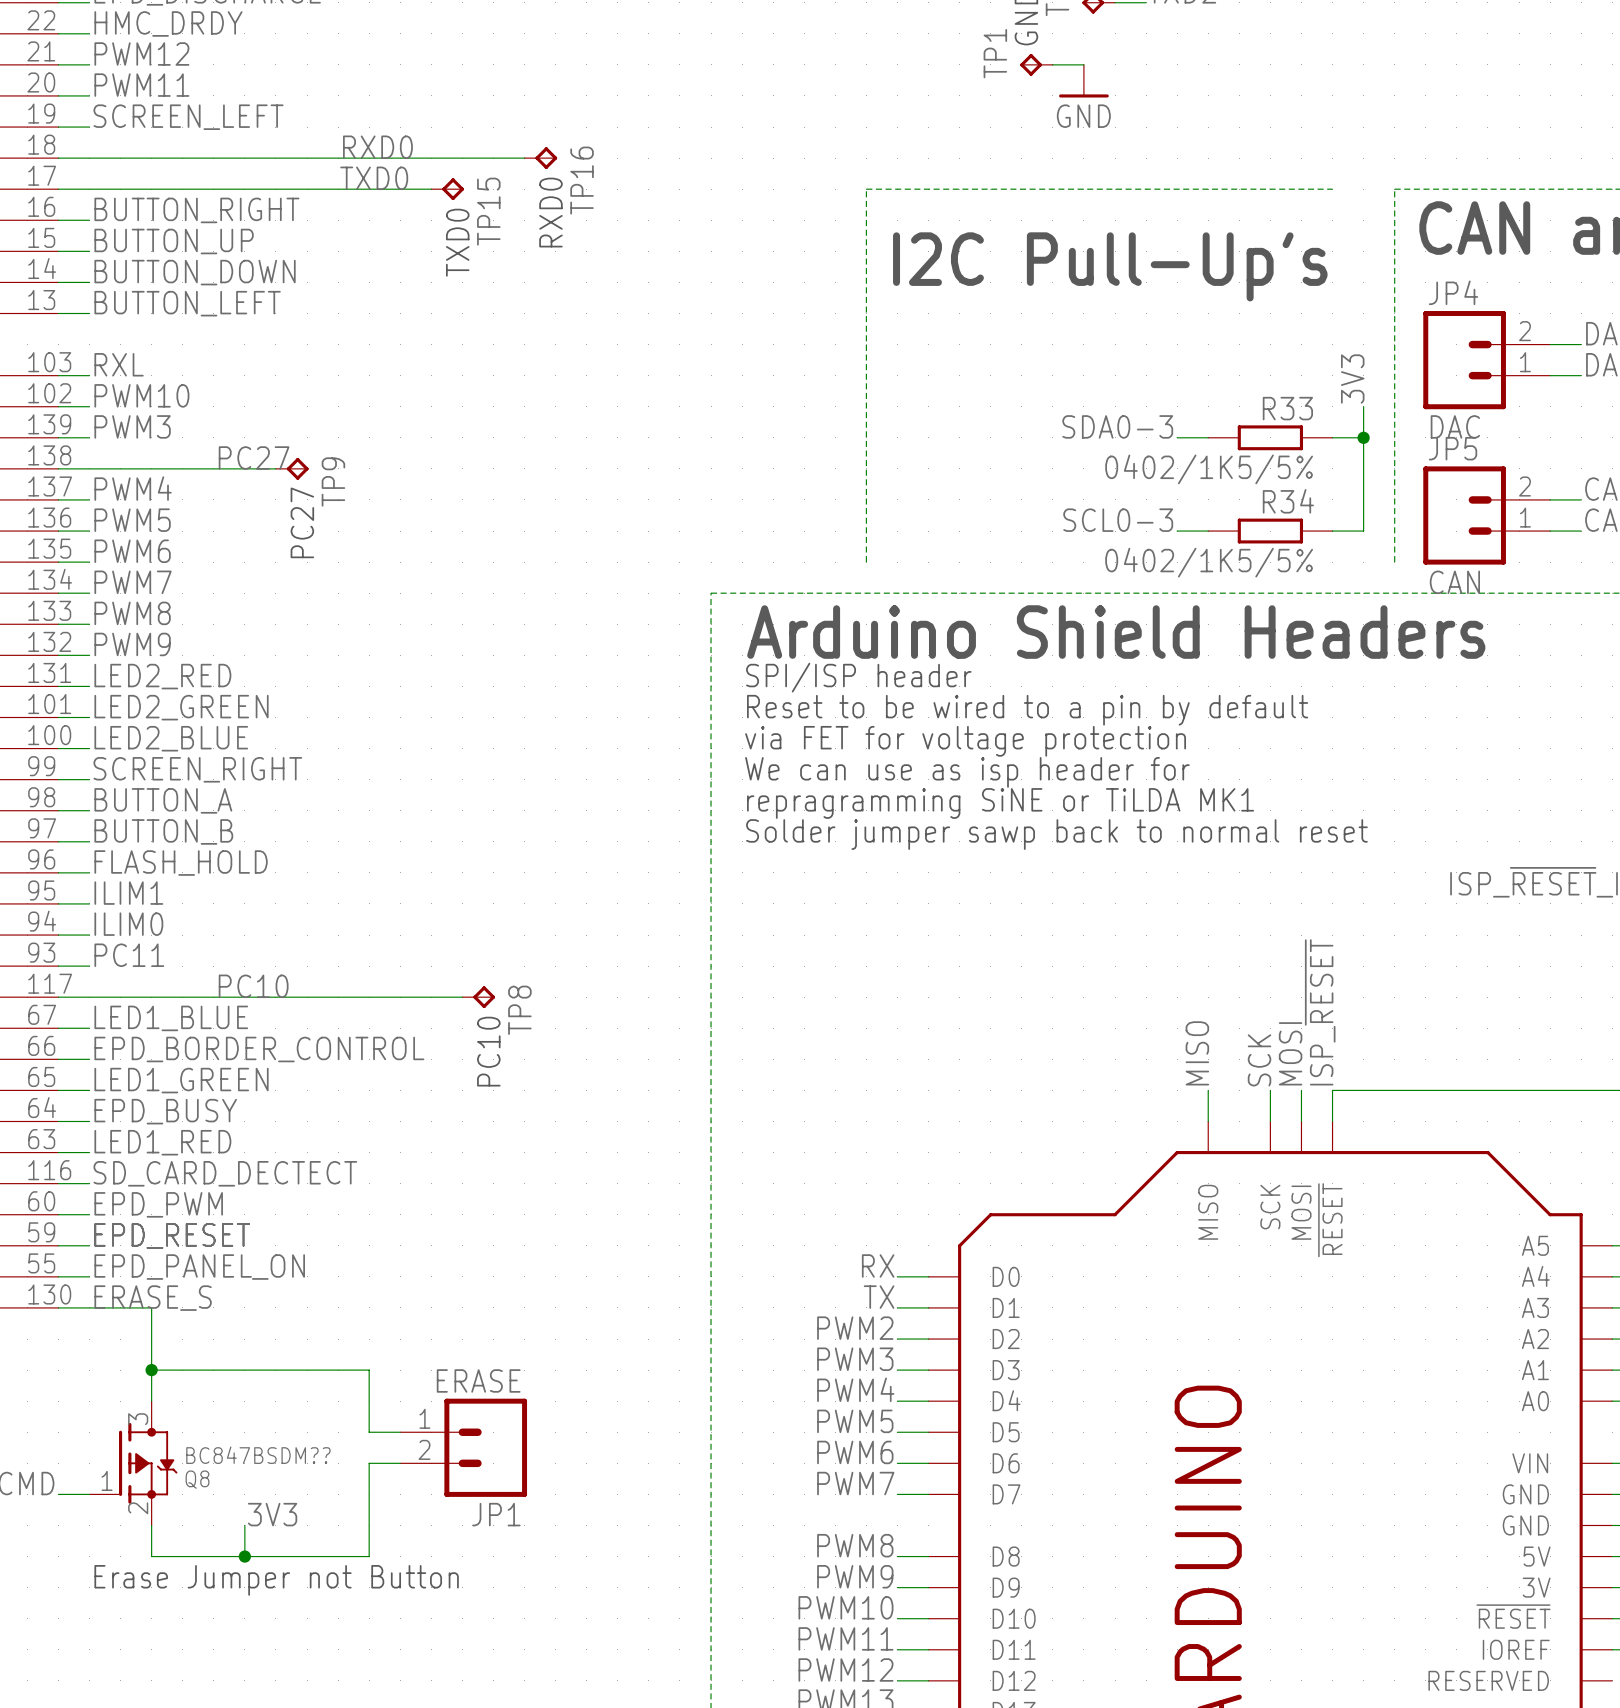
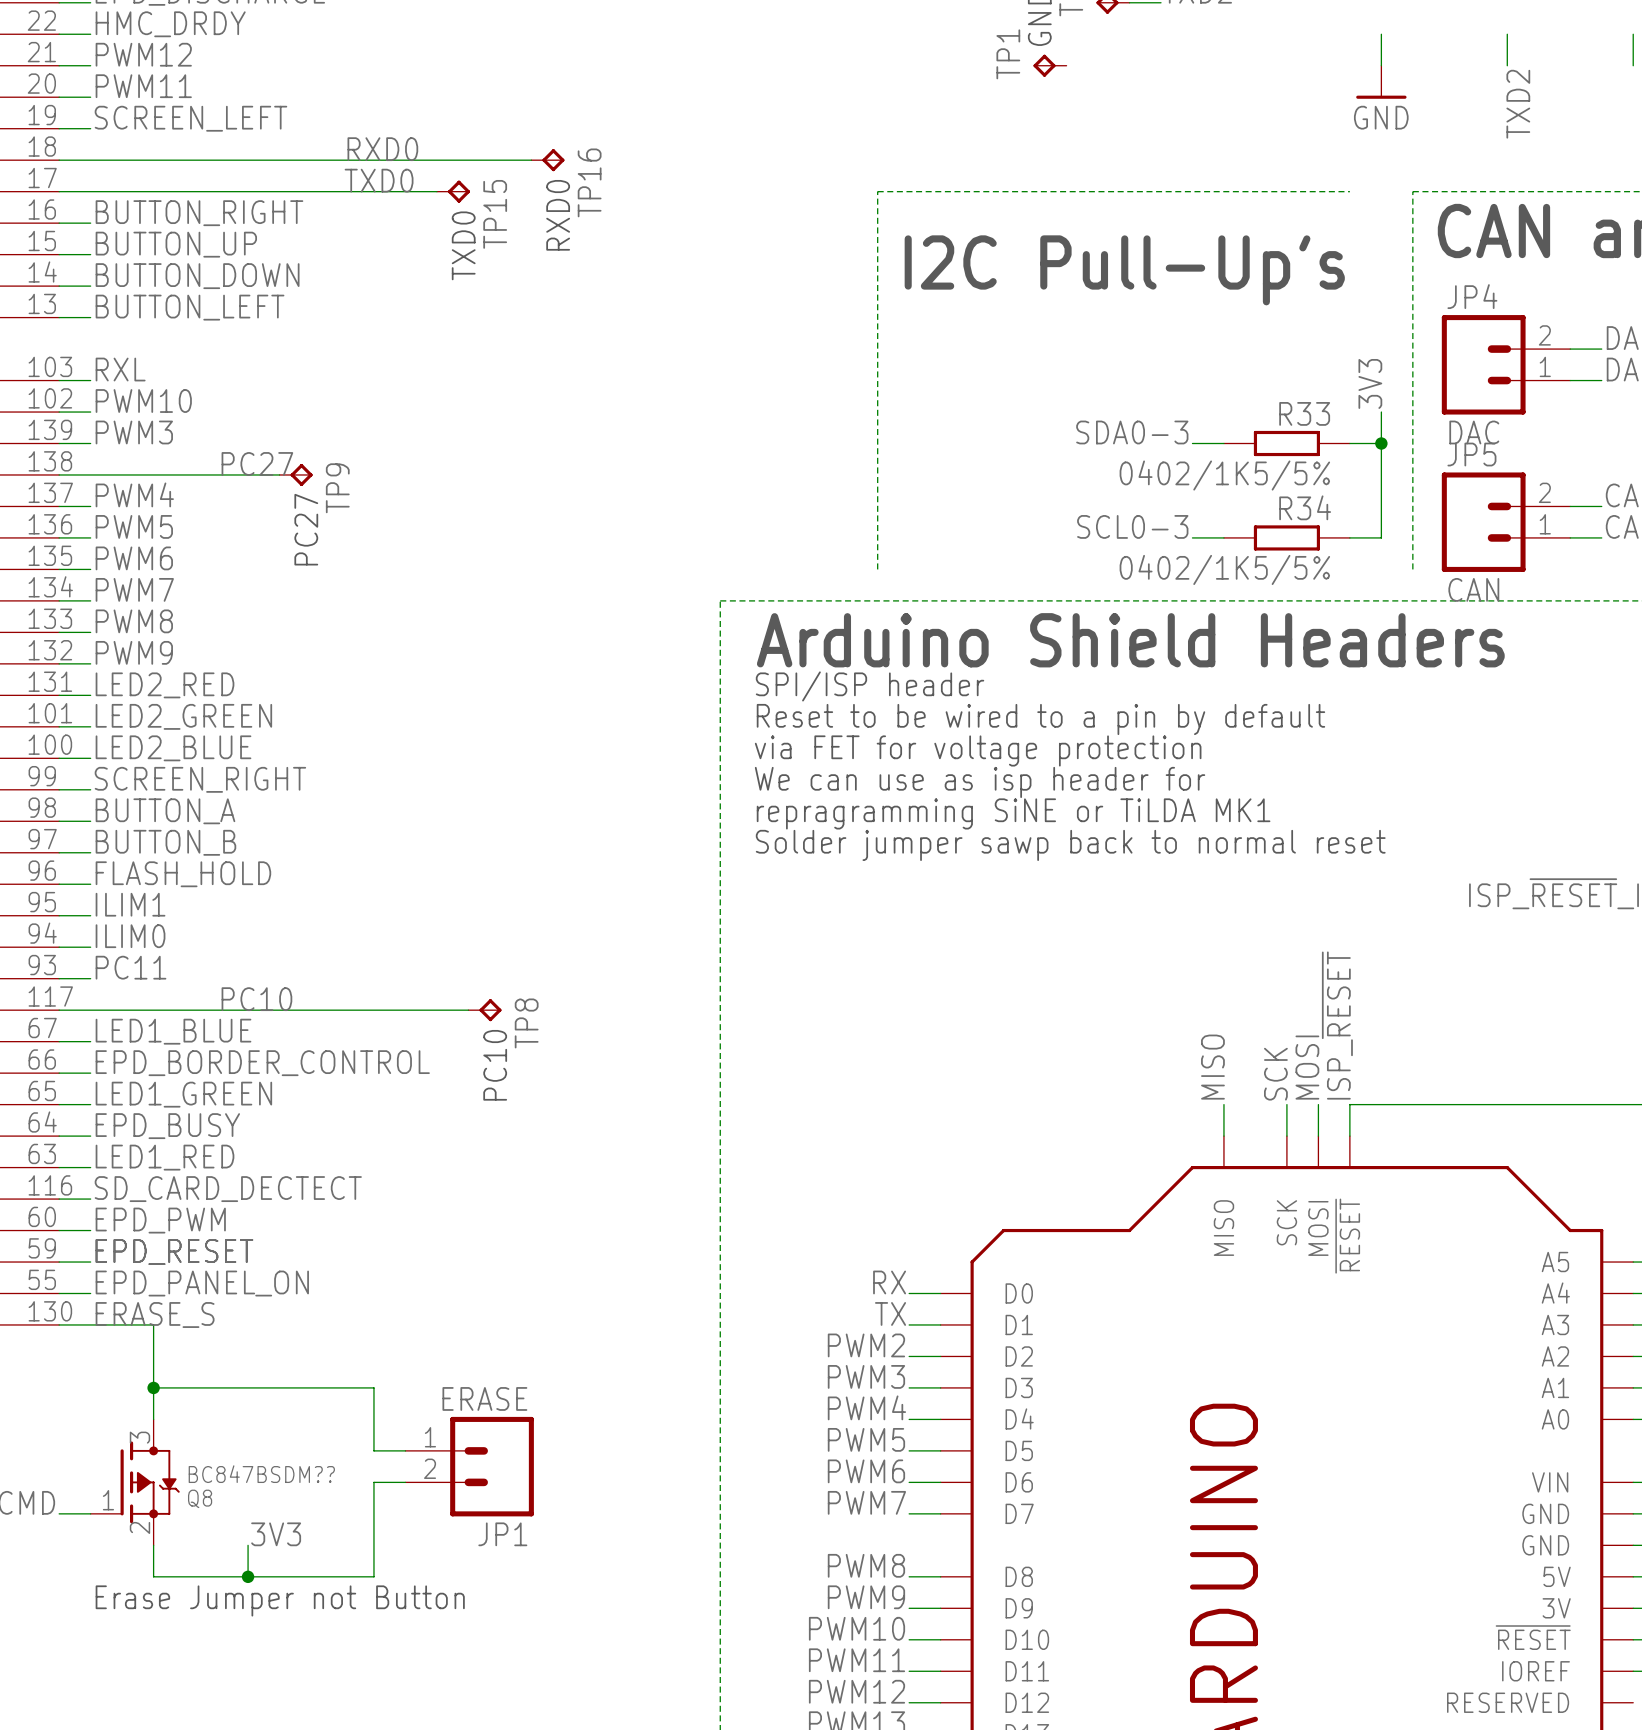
wire: none -> (1381, 34) (1381, 65)
wire: none -> (1507, 34) (1507, 65)
wire: none -> (1633, 34) (1633, 65)
wire: (1052, 64) (1083, 64) -> none
power symbol position: GND (1083, 81) -> GND (1381, 82)
label: none -> TXD2 (1518, 104)

